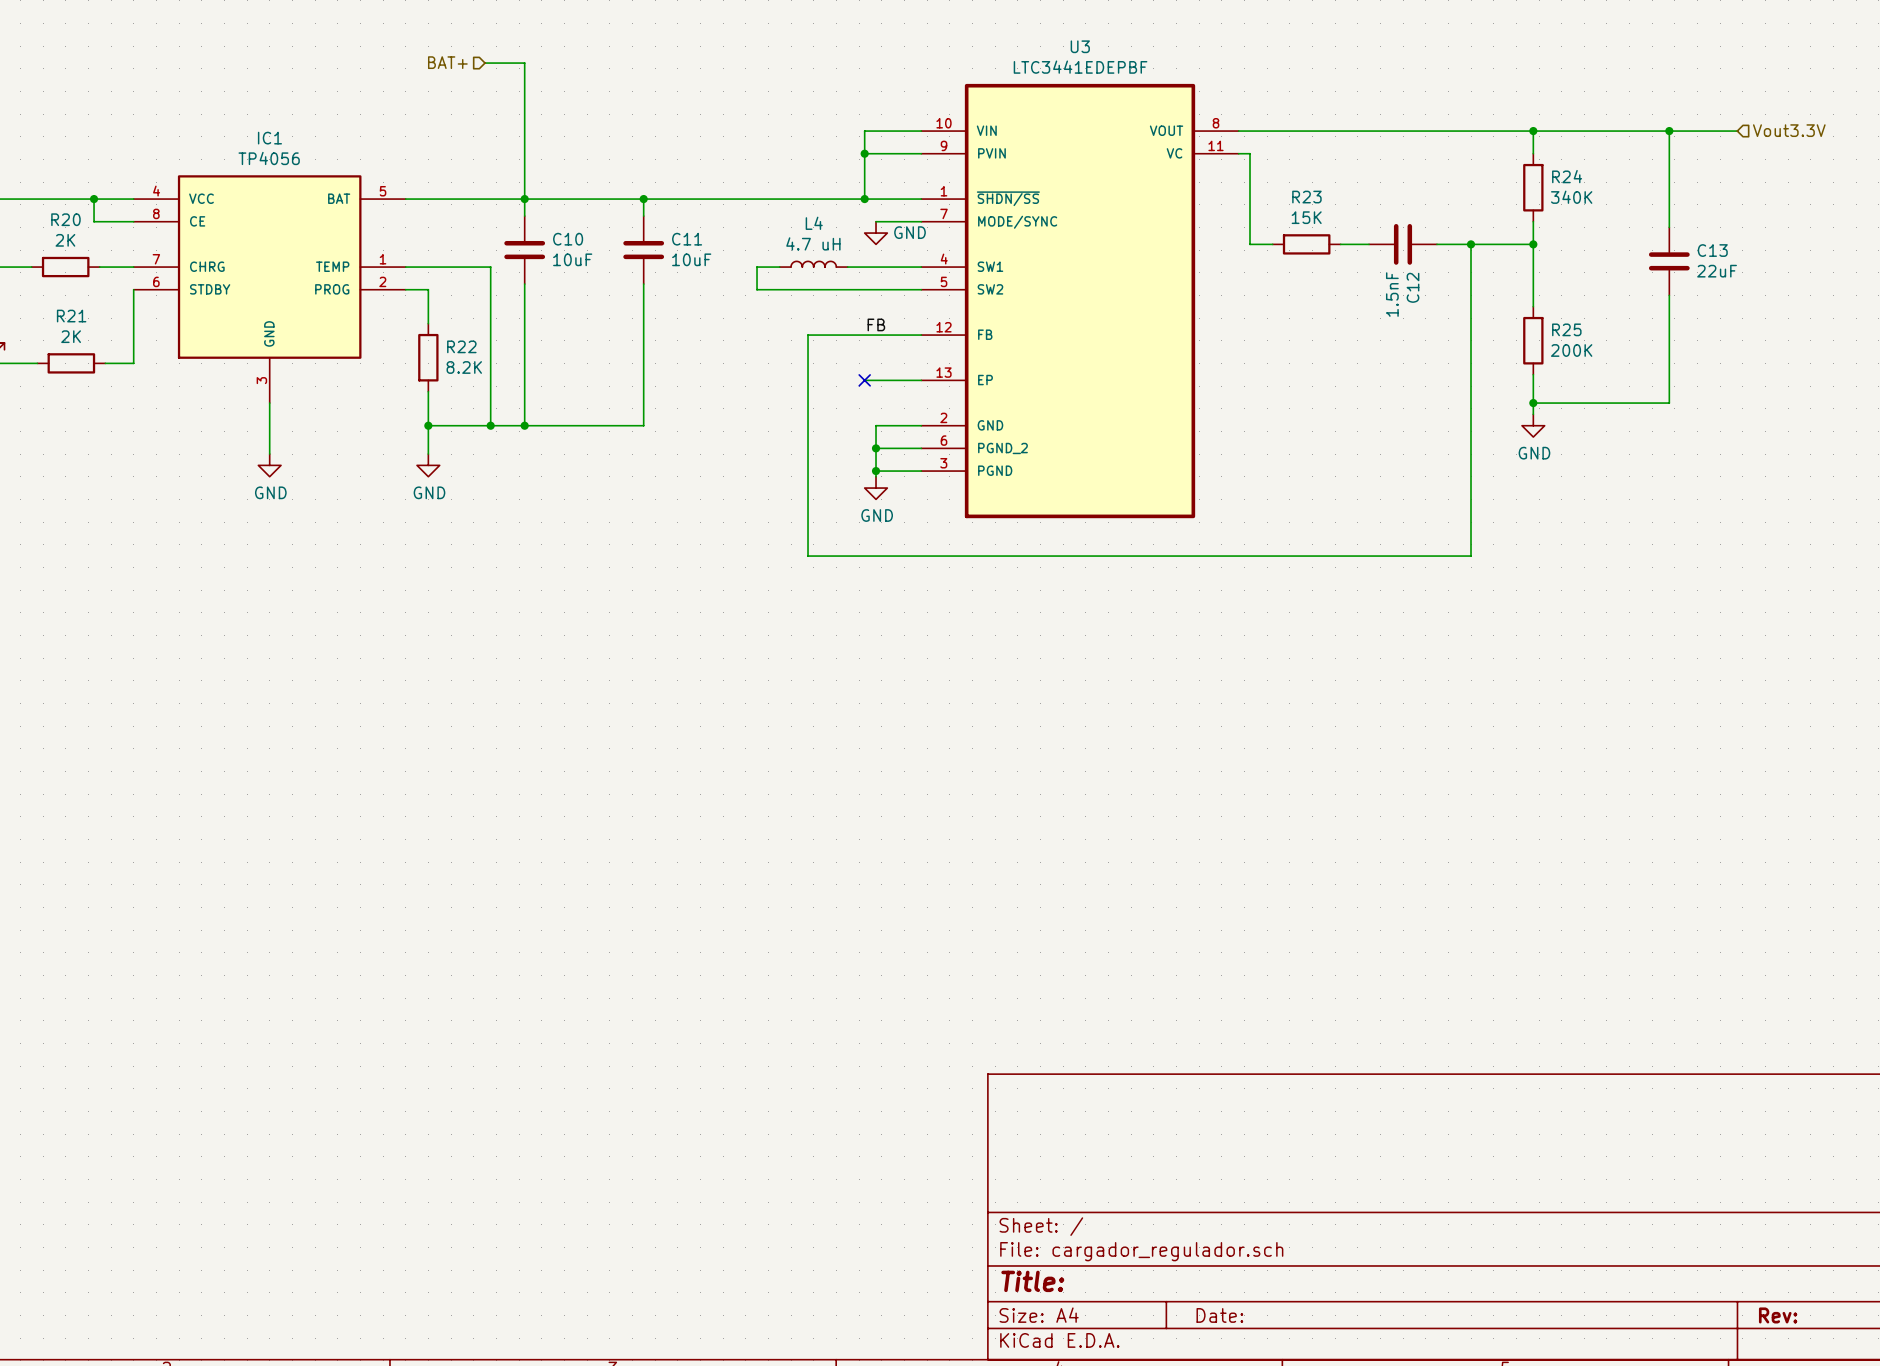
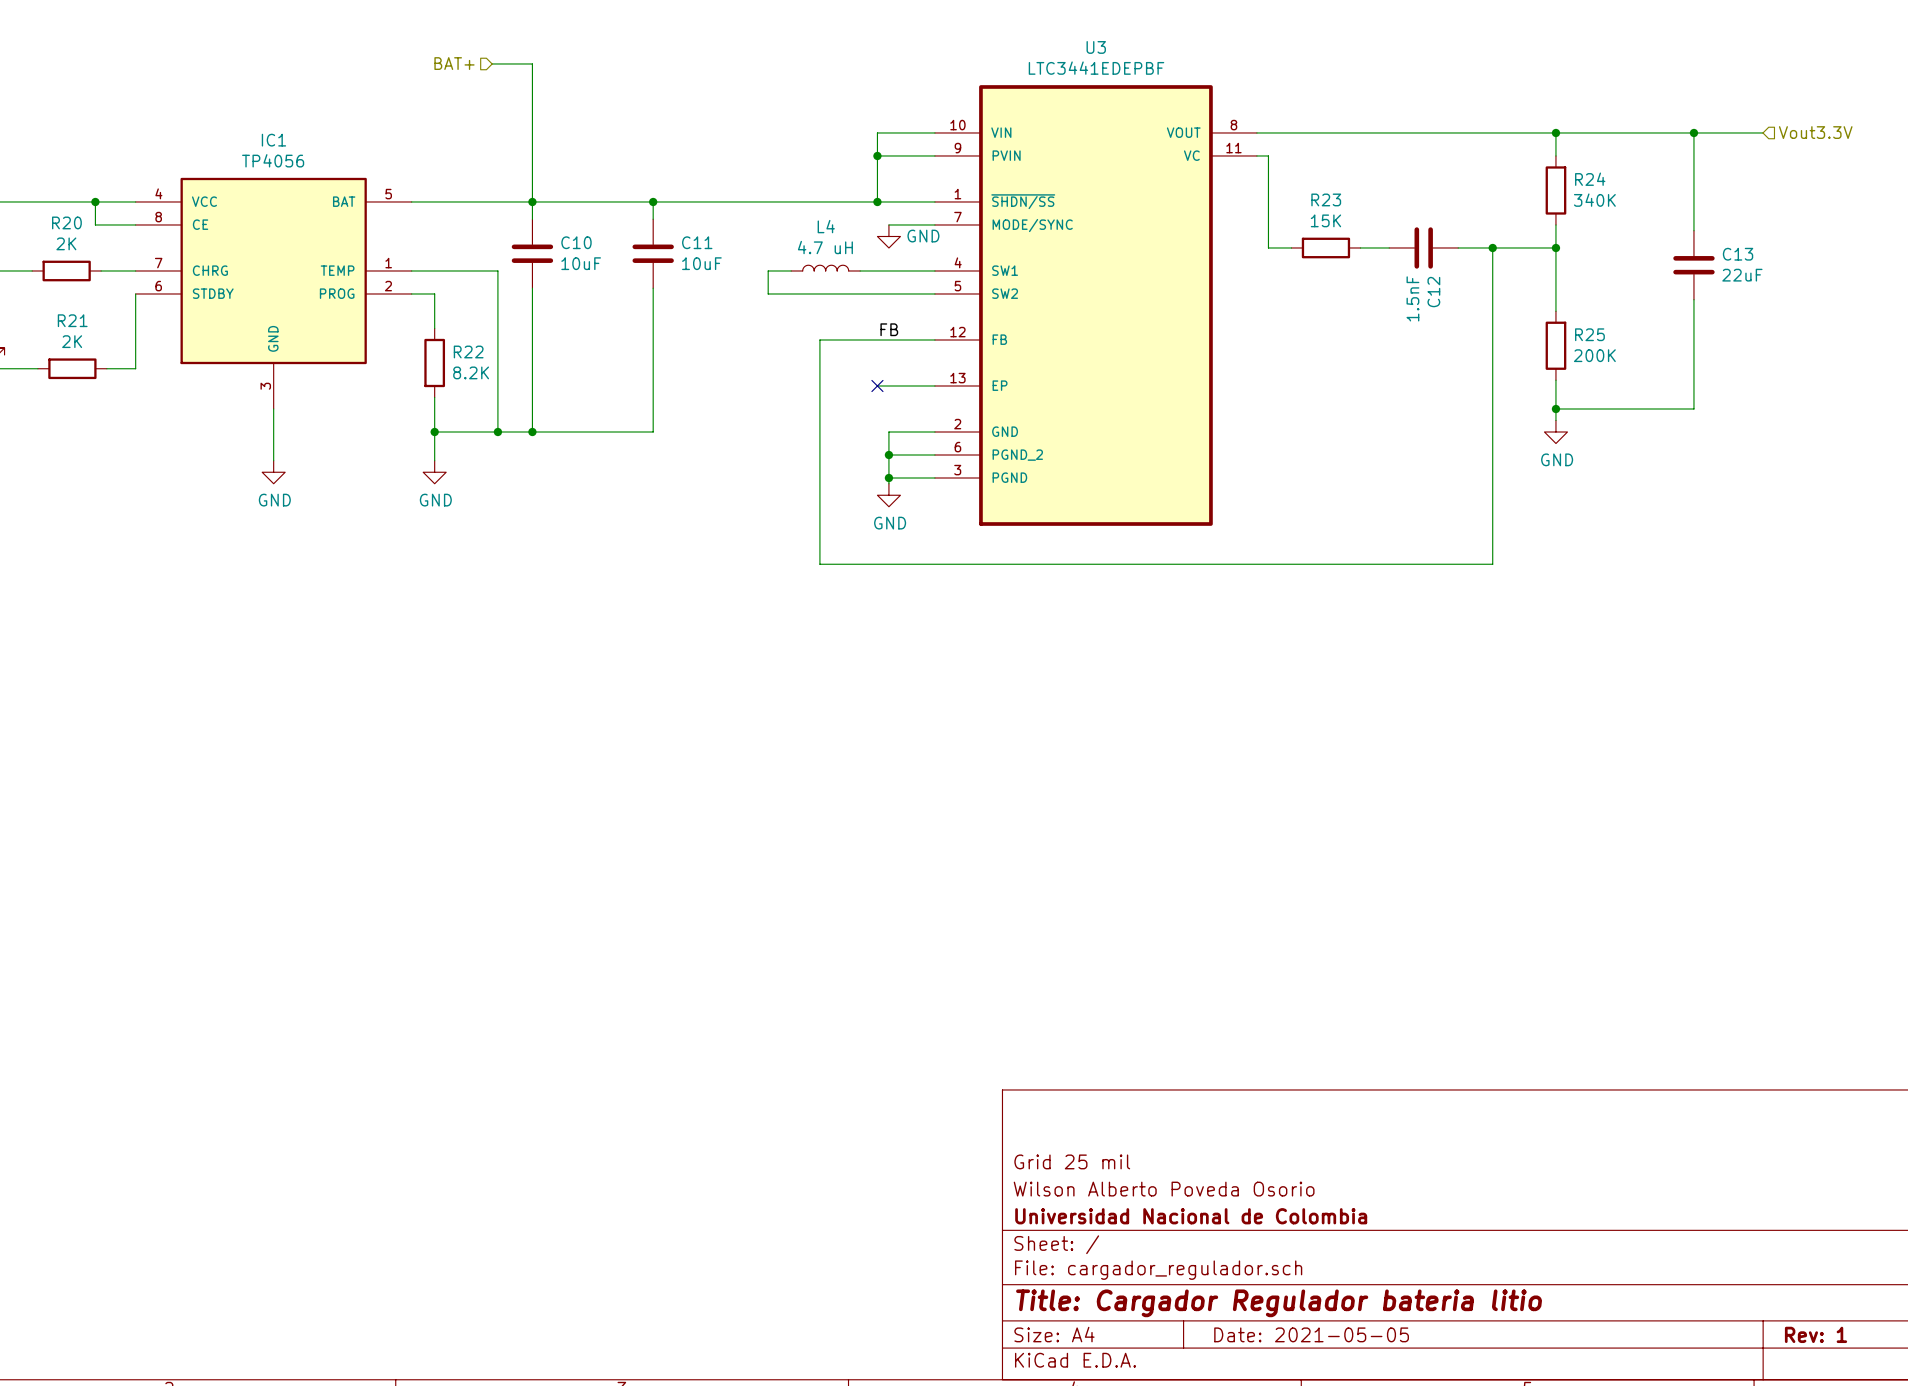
title block: none -> Grid 25 mil (1072, 1161)
title block: none -> Wilson Alberto Poveda Osorio (1164, 1189)
title block: none -> Universidad Nacional de Colombia (1191, 1216)
title block: Title: (1032, 1281) -> Title: Cargador Regulador bateria litio (1279, 1303)
title block: Date: (1219, 1315) -> Date: 2021-05-05 (1311, 1334)
title block: Rev: (1778, 1315) -> Rev: 1 (1816, 1334)

